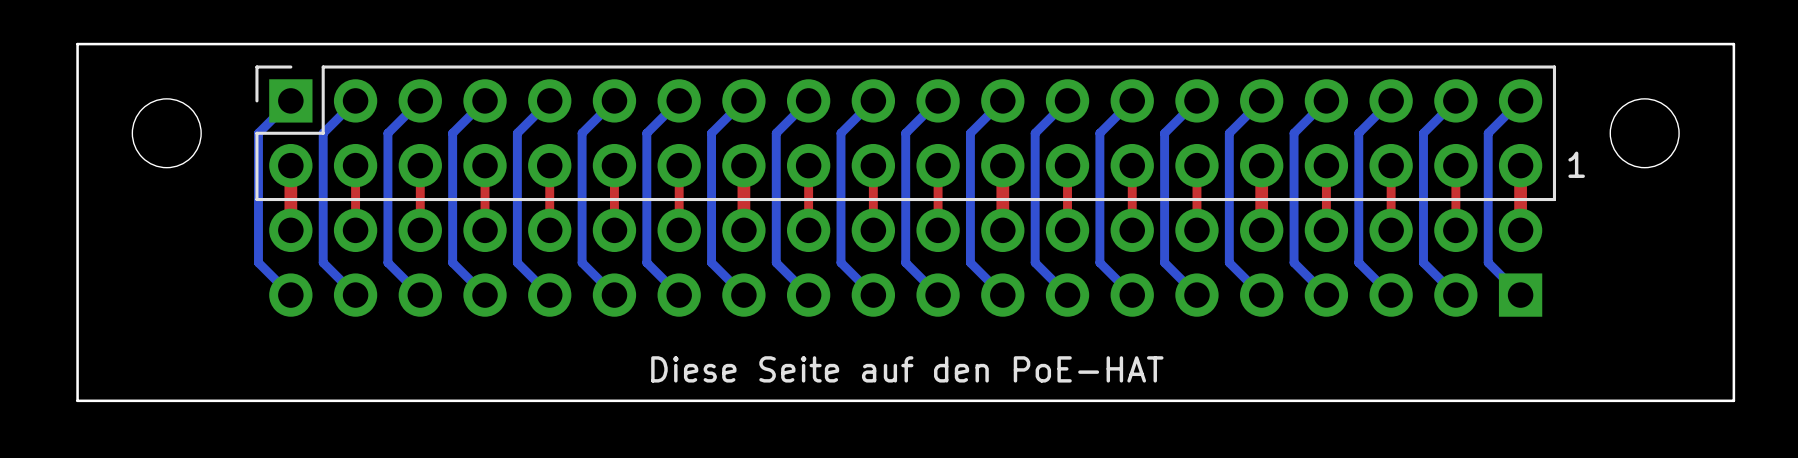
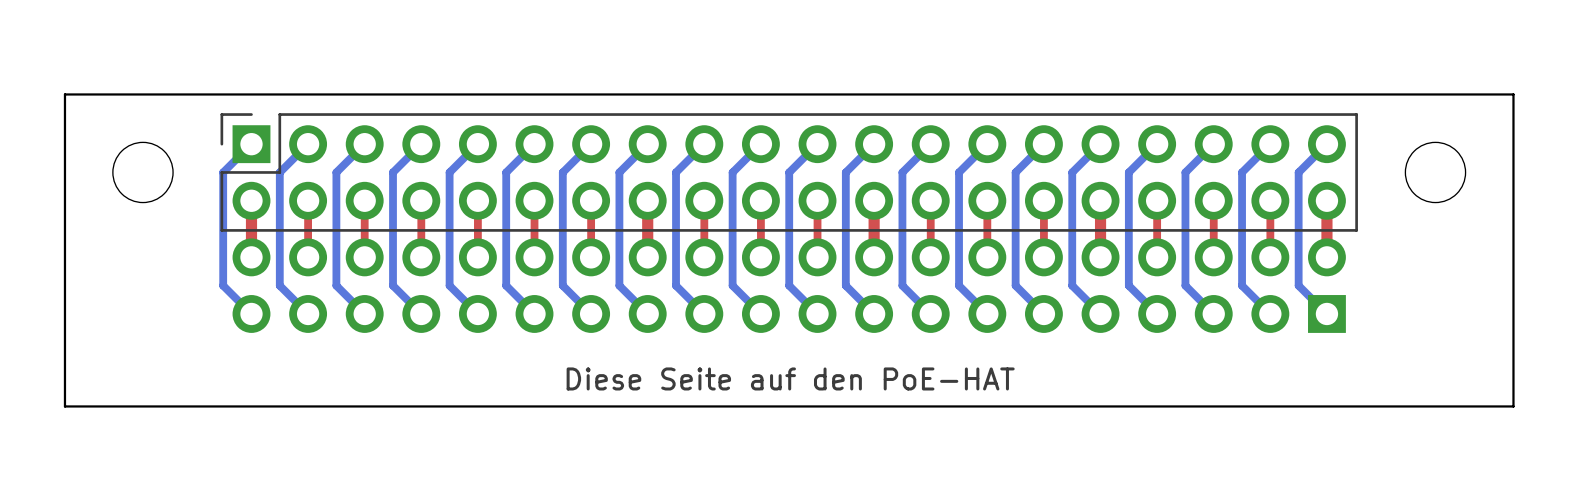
text: 1 (1576, 164) -> none

